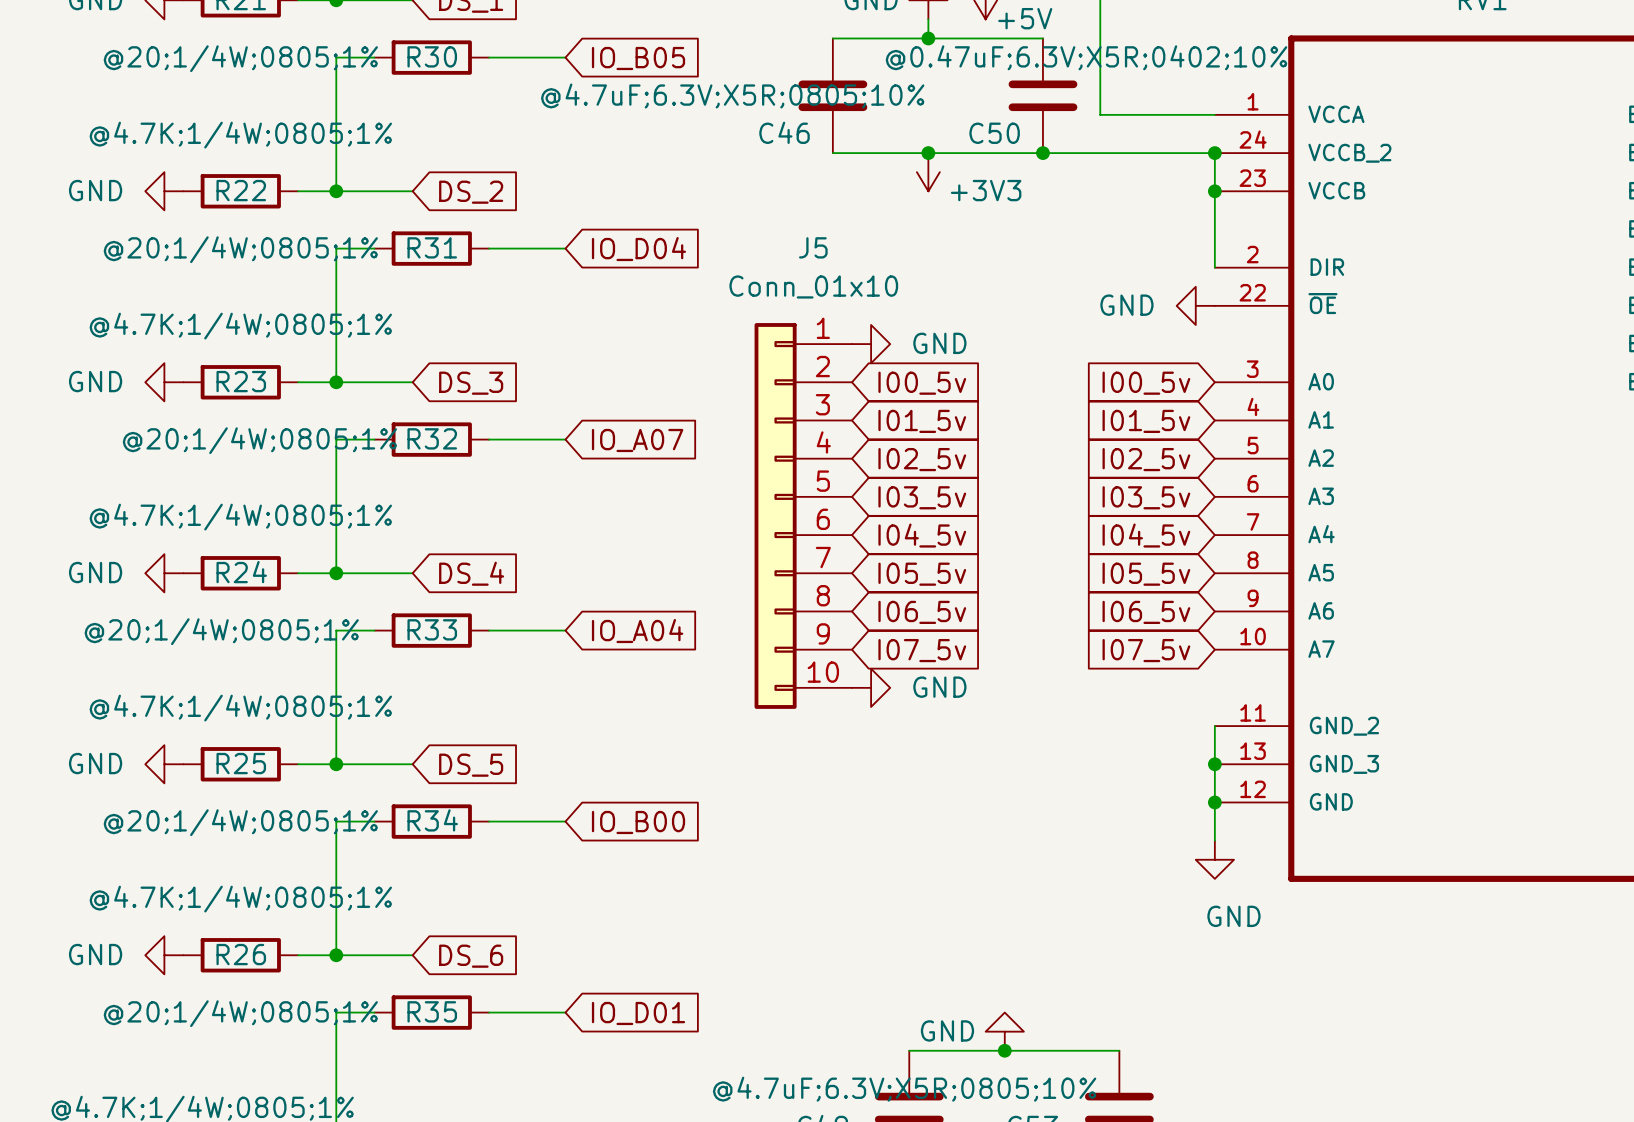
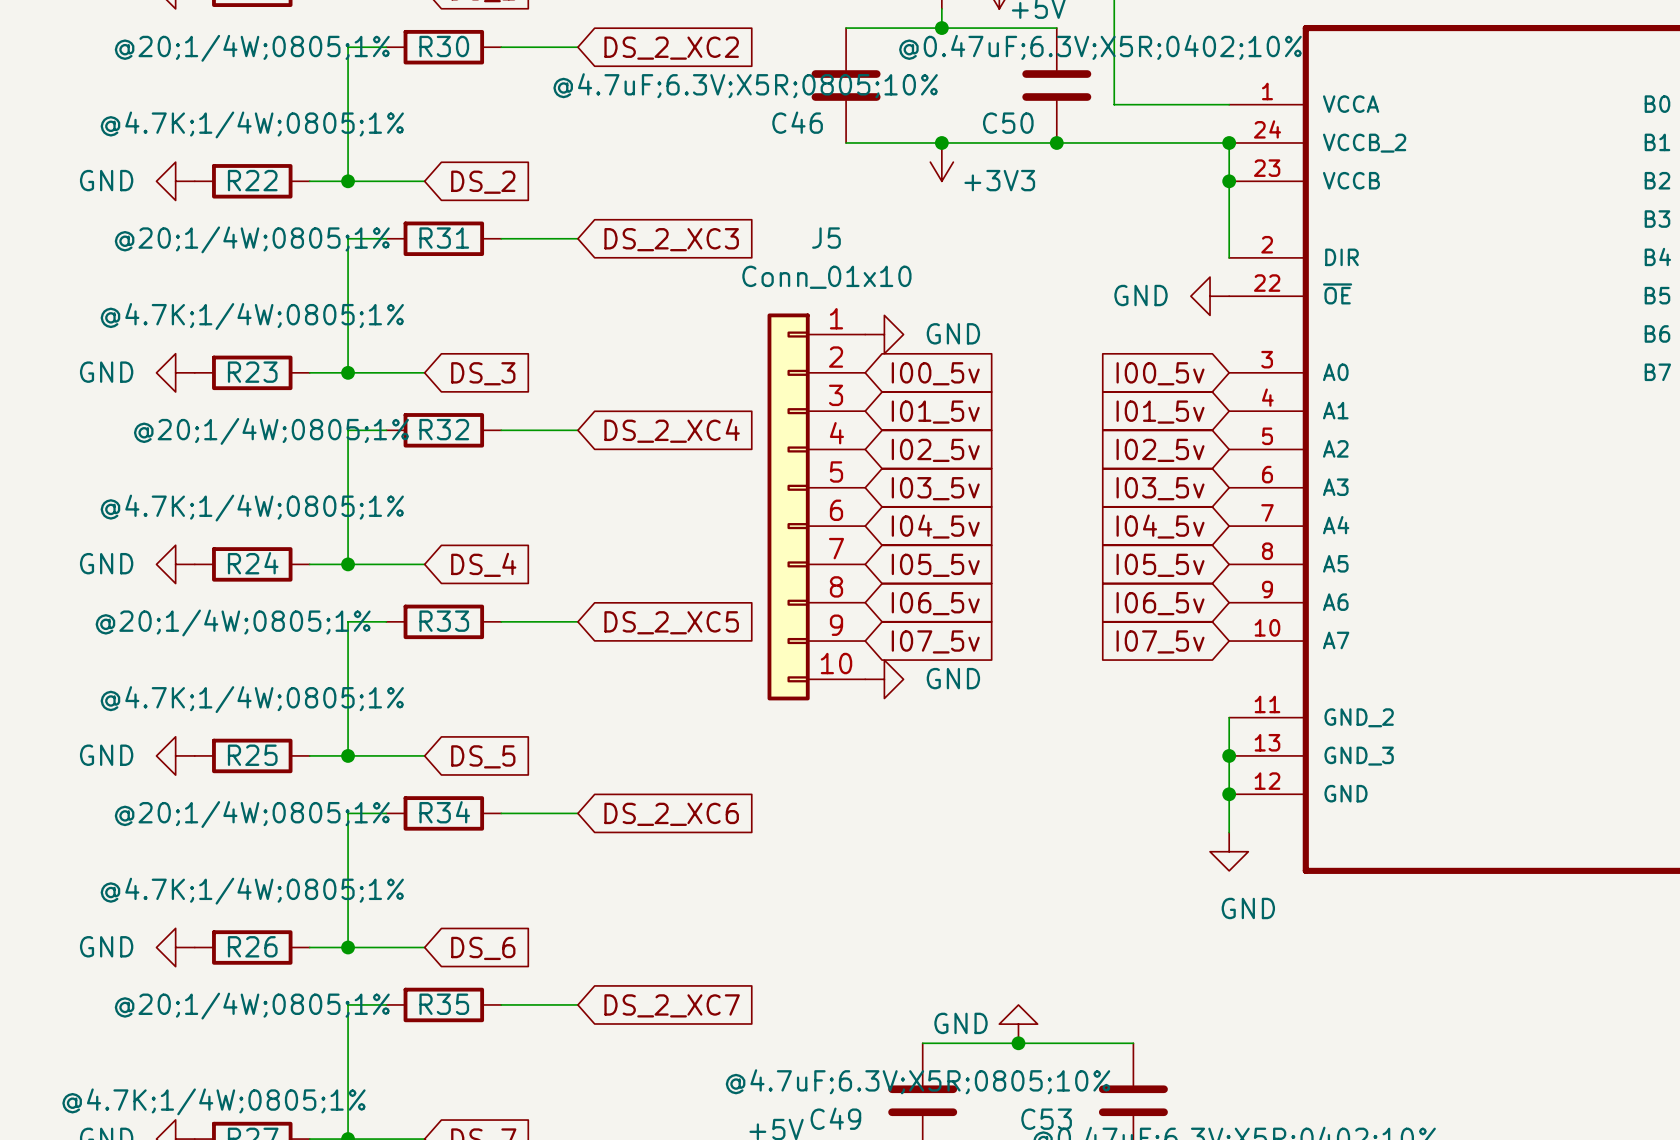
global label: IO_B05 (638, 58) -> DS_2_XC2 (671, 48)
global label: IO_D04 (638, 249) -> DS_2_XC3 (671, 239)
global label: IO_A07 (637, 440) -> DS_2_XC4 (672, 430)
global label: IO_A04 (637, 631) -> DS_2_XC5 (671, 622)
global label: IO_B00 (638, 822) -> DS_2_XC6 (671, 814)
global label: IO_D01 (638, 1013) -> DS_2_XC7 (672, 1005)

